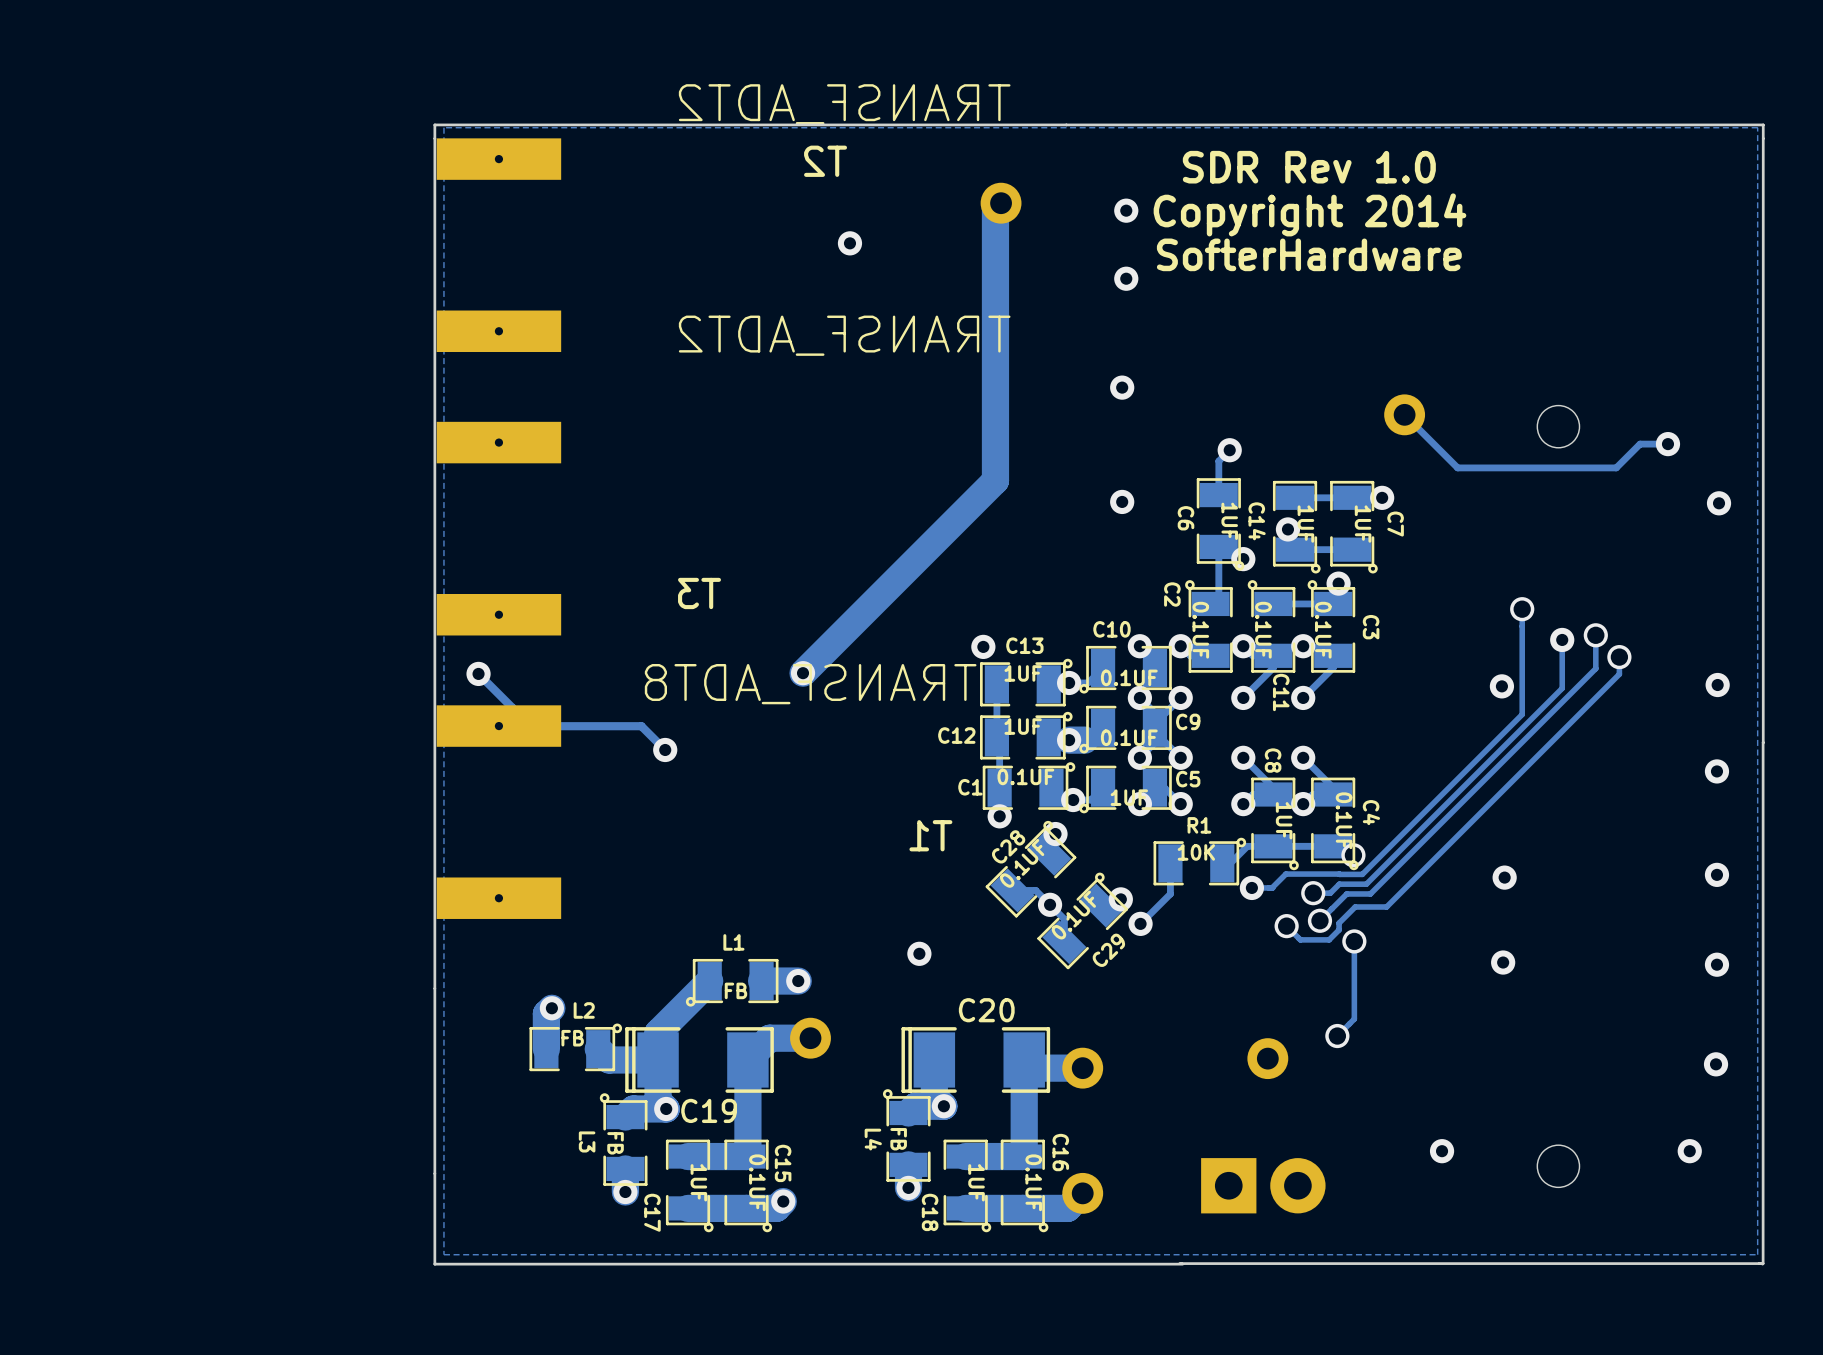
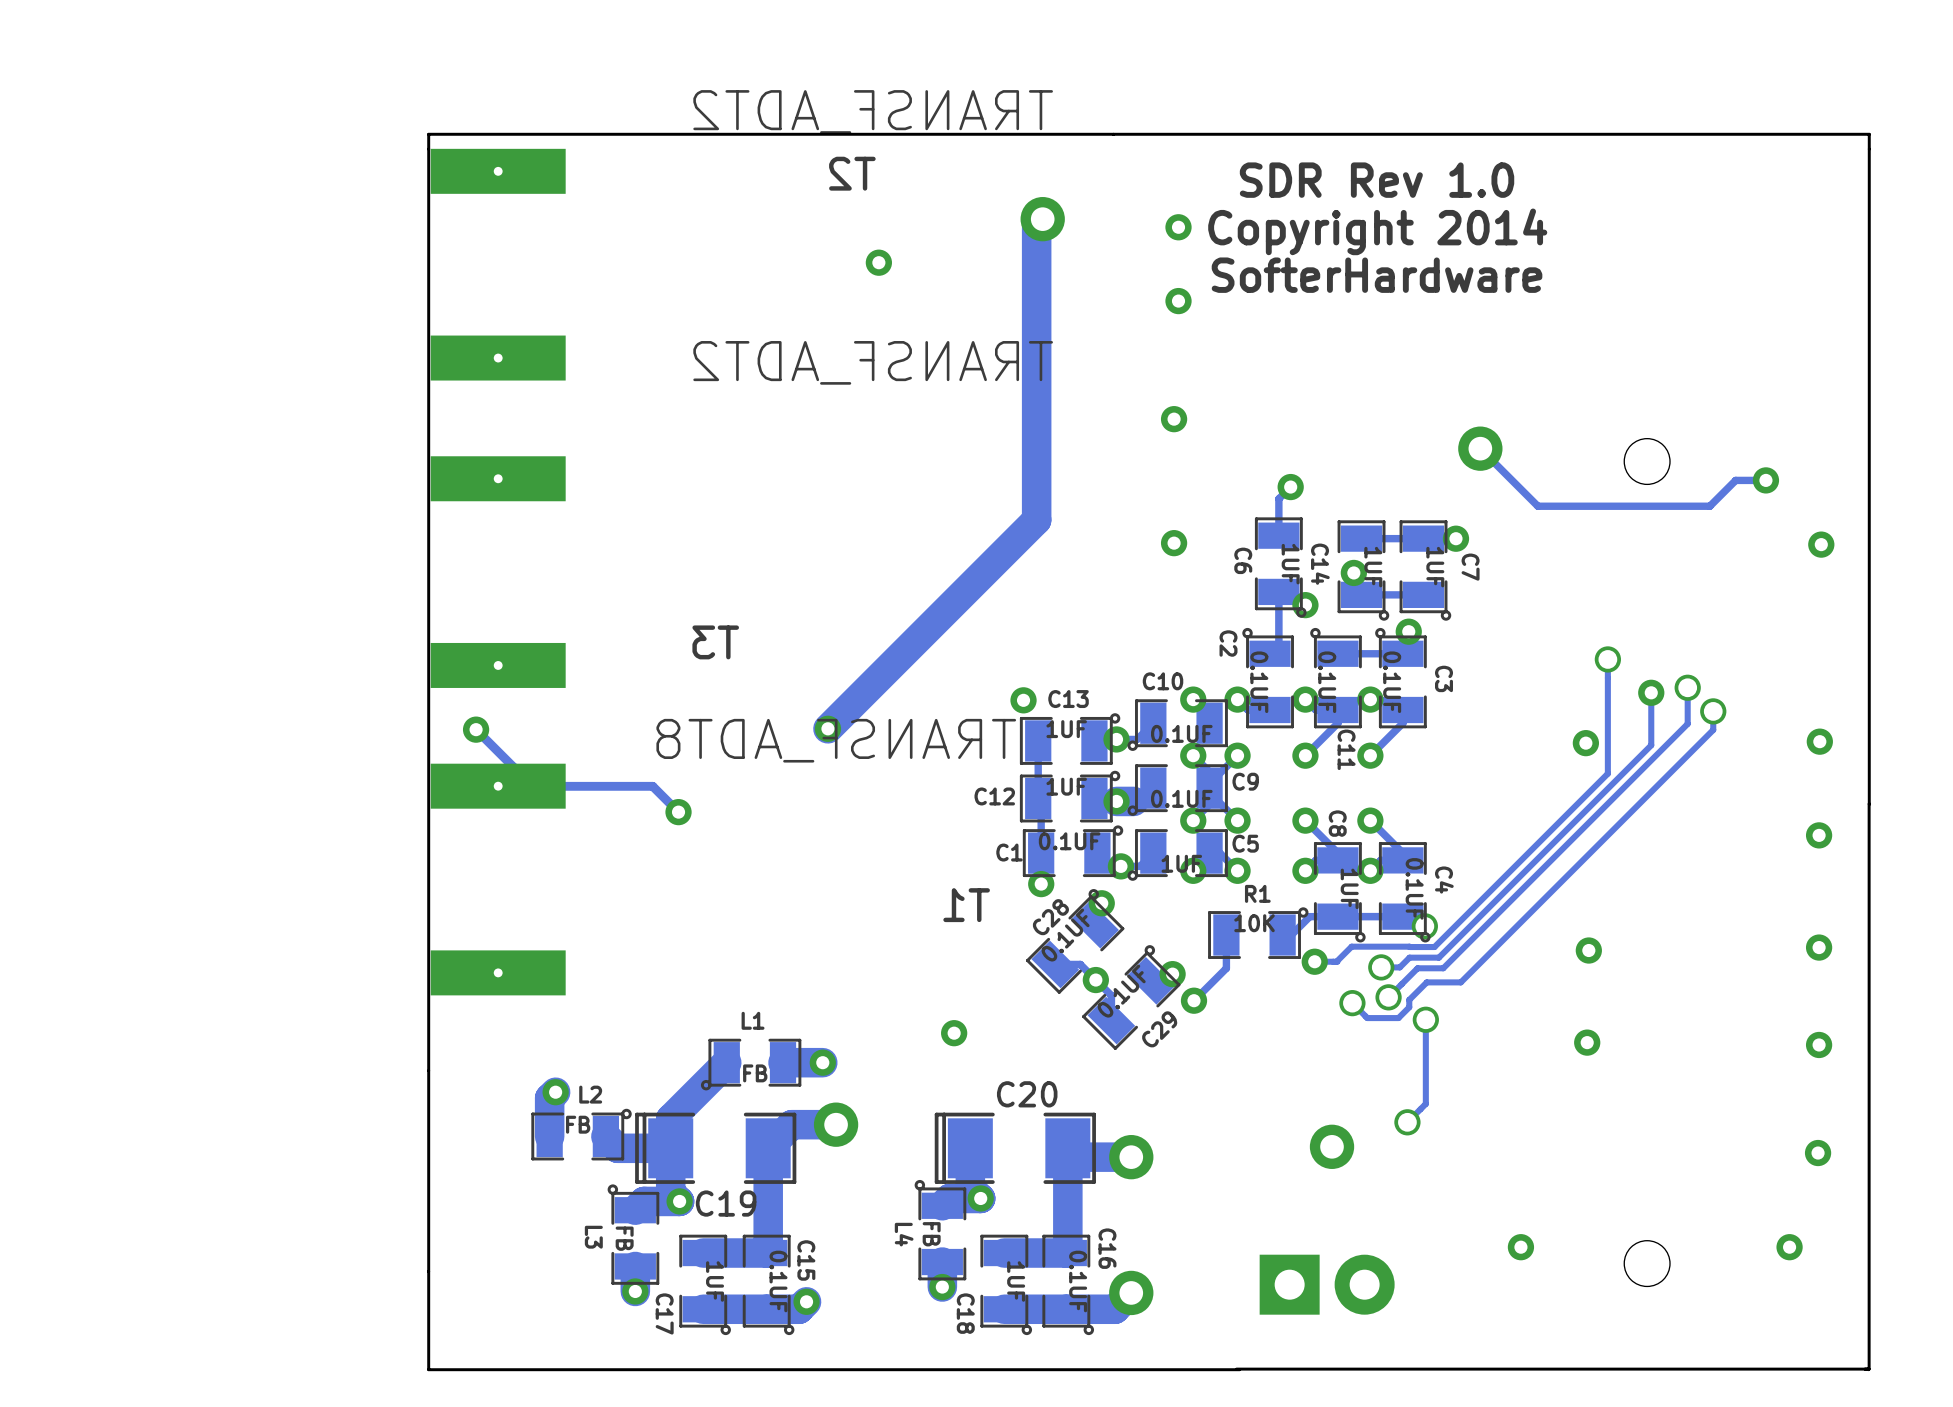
zone outline: (1757, 127) (1757, 1254) (443, 1254) (443, 127) (1757, 127) -> none

